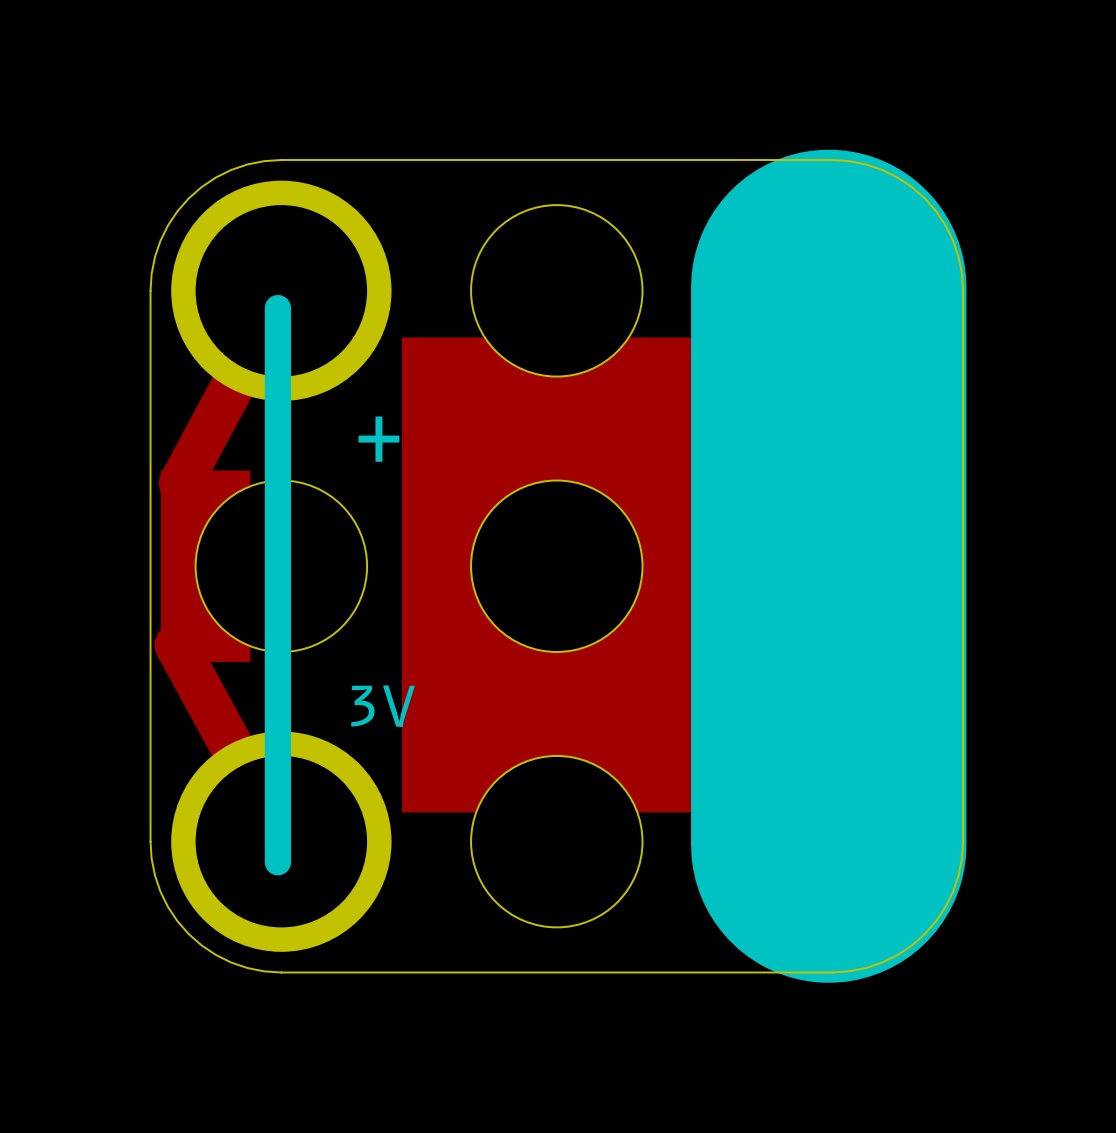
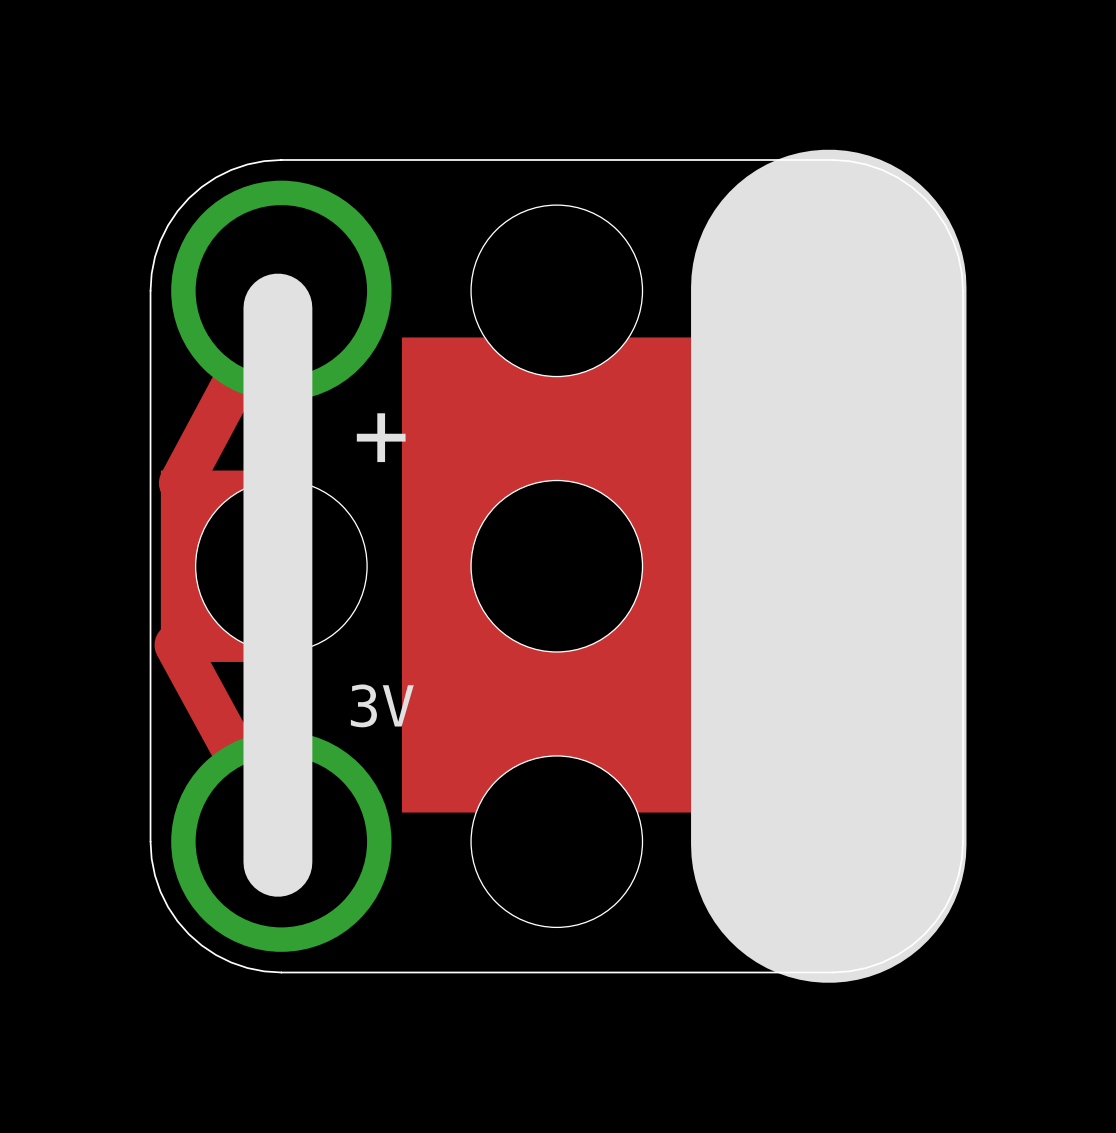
part footprint: [149, 149, 967, 983] -> [149, 149, 967, 983]

